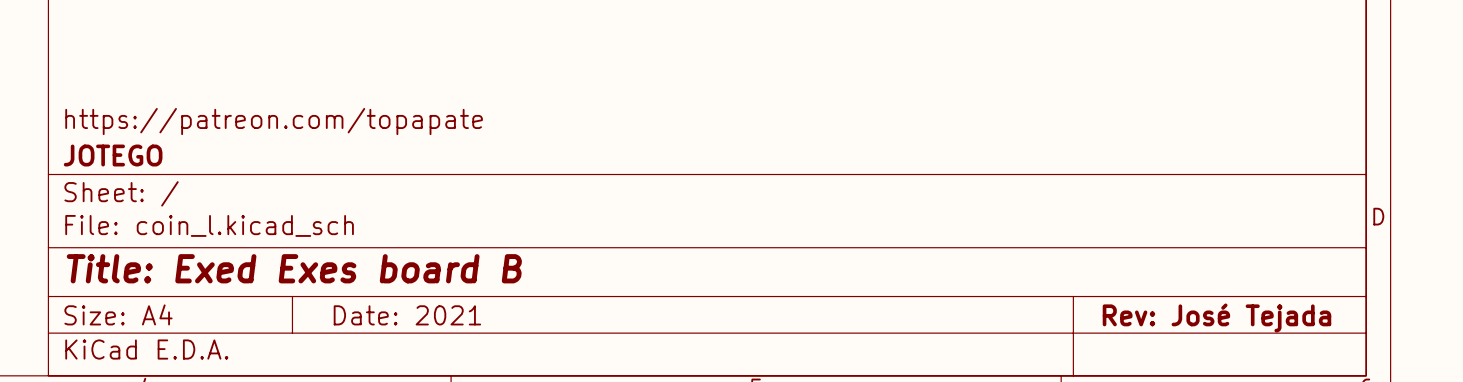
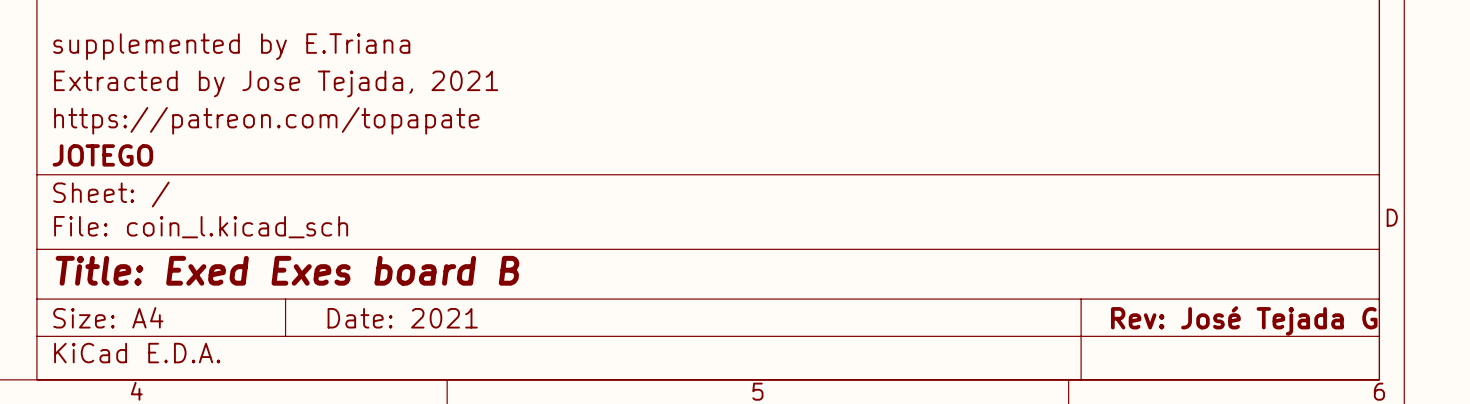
title block: none -> supplemented by E.Triana (231, 46)
title block: none -> Extracted by Jose Tejada, 2021 (276, 83)
title block: Rev: José Tejada (1216, 317) -> Rev: José Tejada G (1244, 320)

